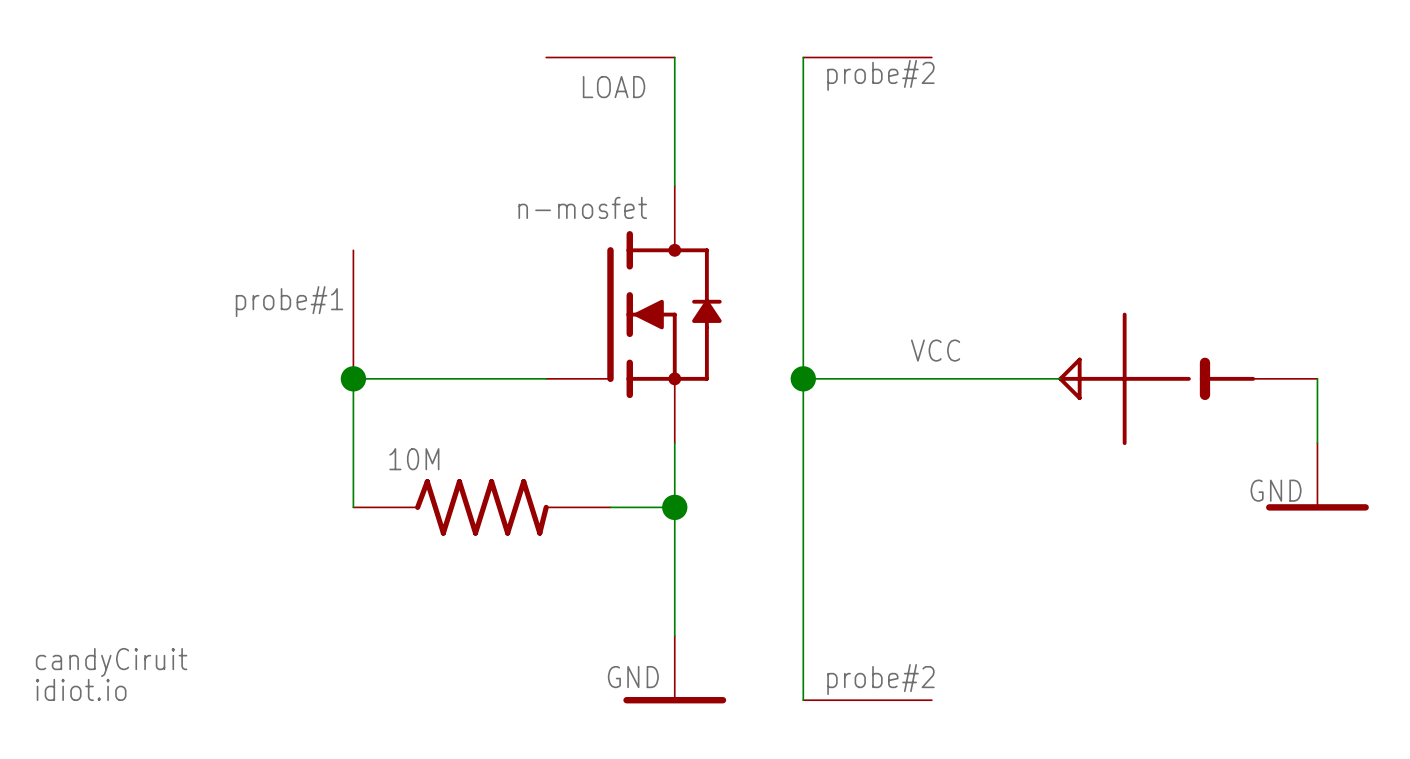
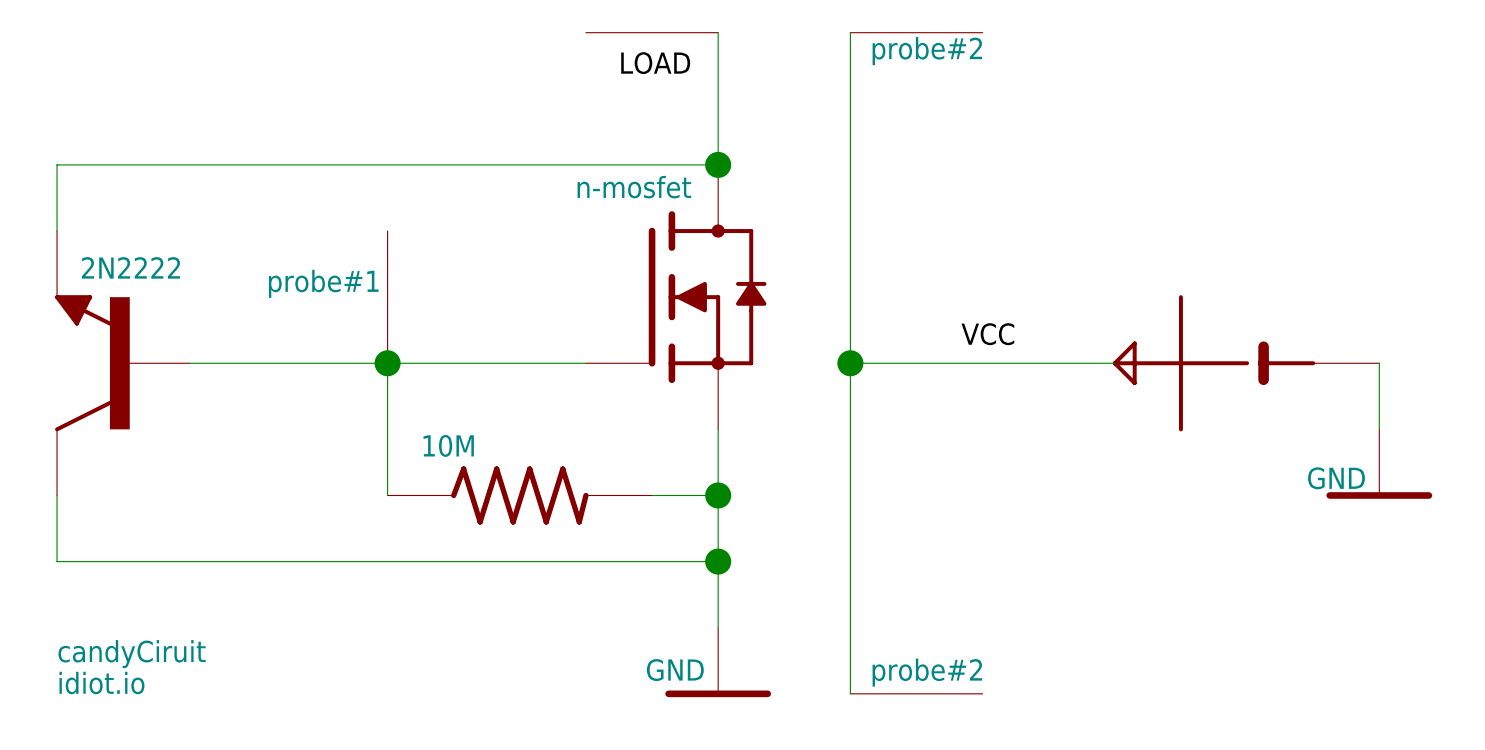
wire: none -> (718, 164) (57, 164) (57, 231)
junction: none -> (718, 164)
2N2222: none -> (122, 363)
wire: none -> (189, 363) (387, 363)
wire: none -> (57, 495) (57, 561) (718, 561)
junction: none -> (718, 561)

